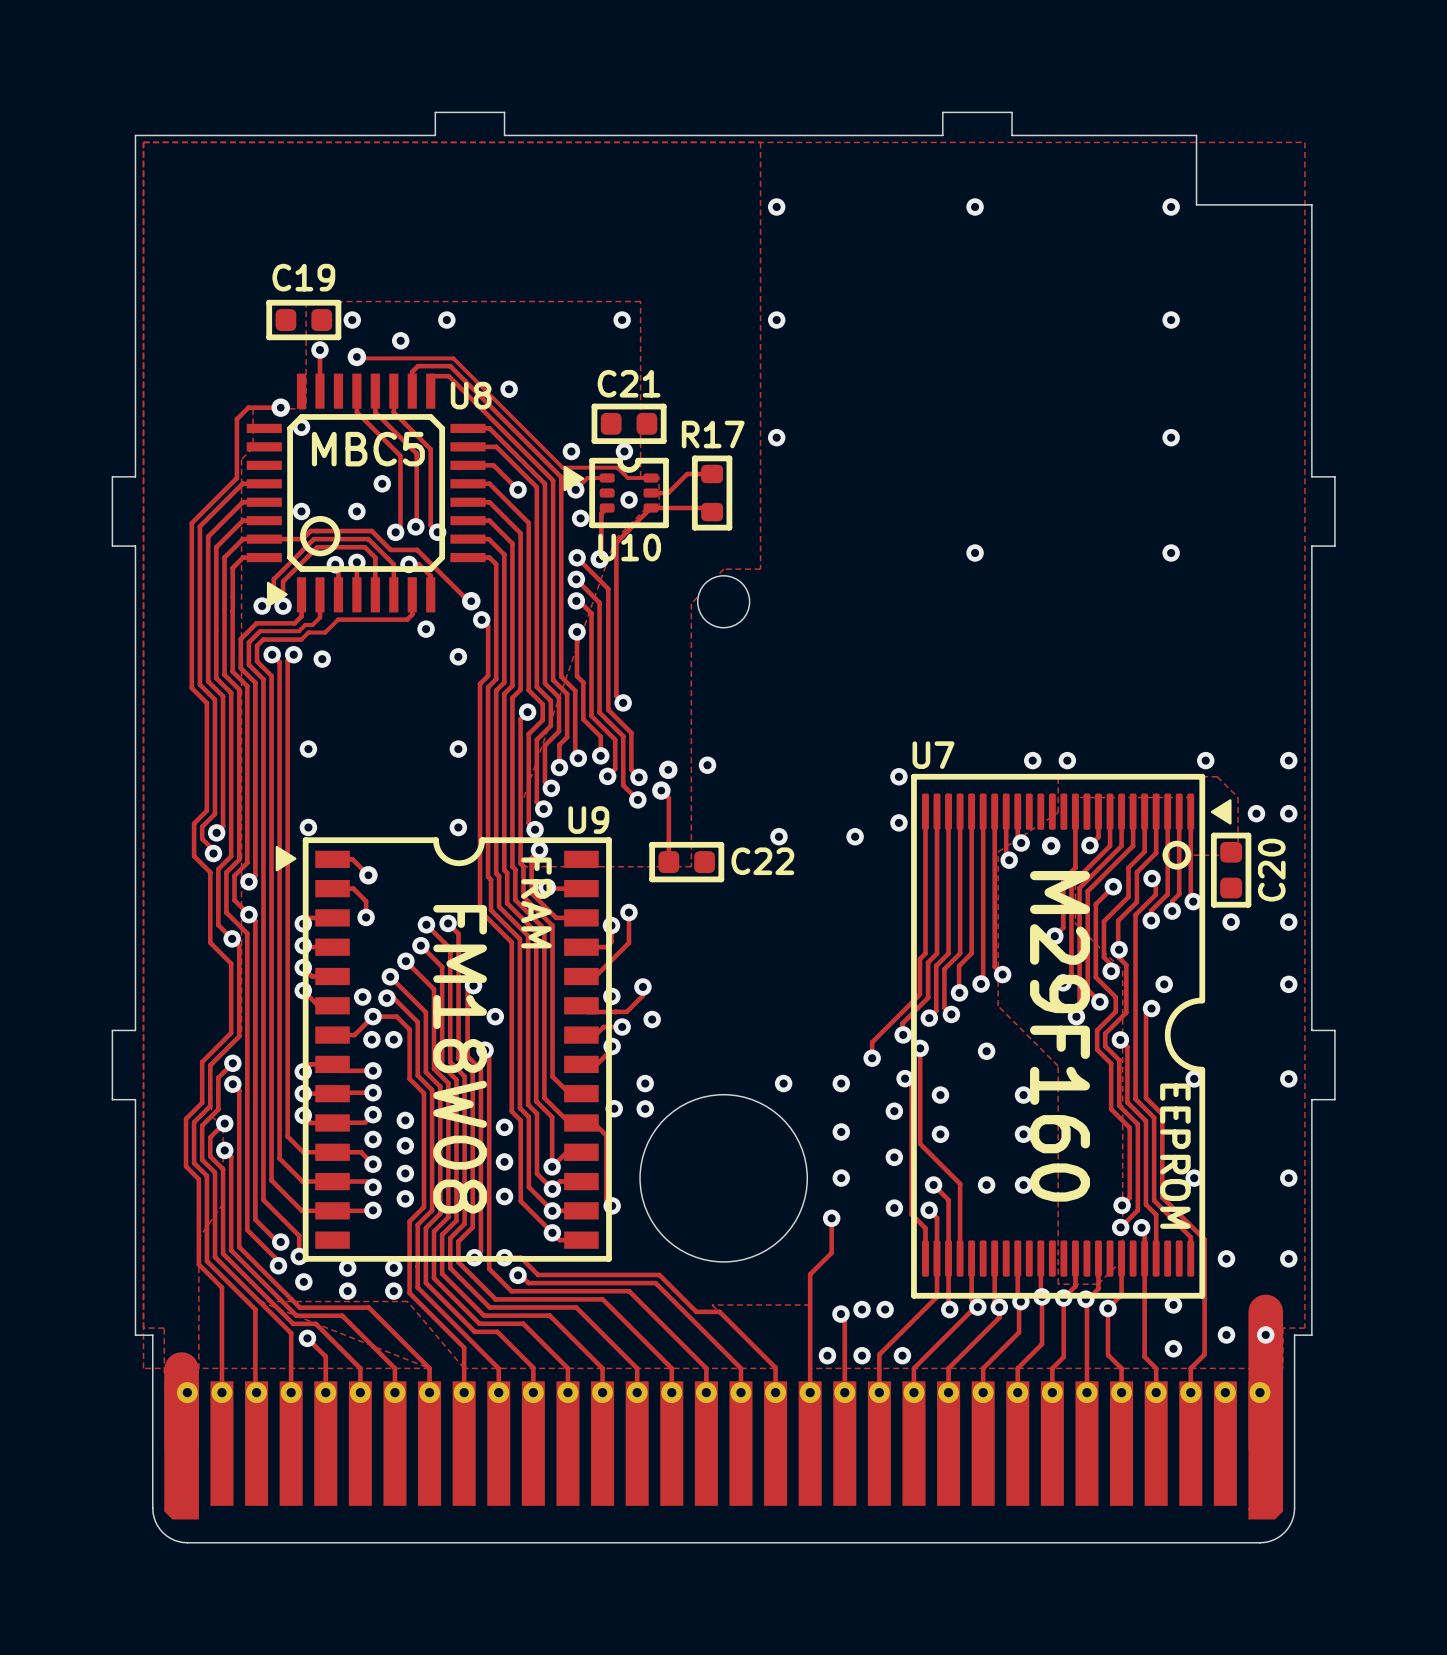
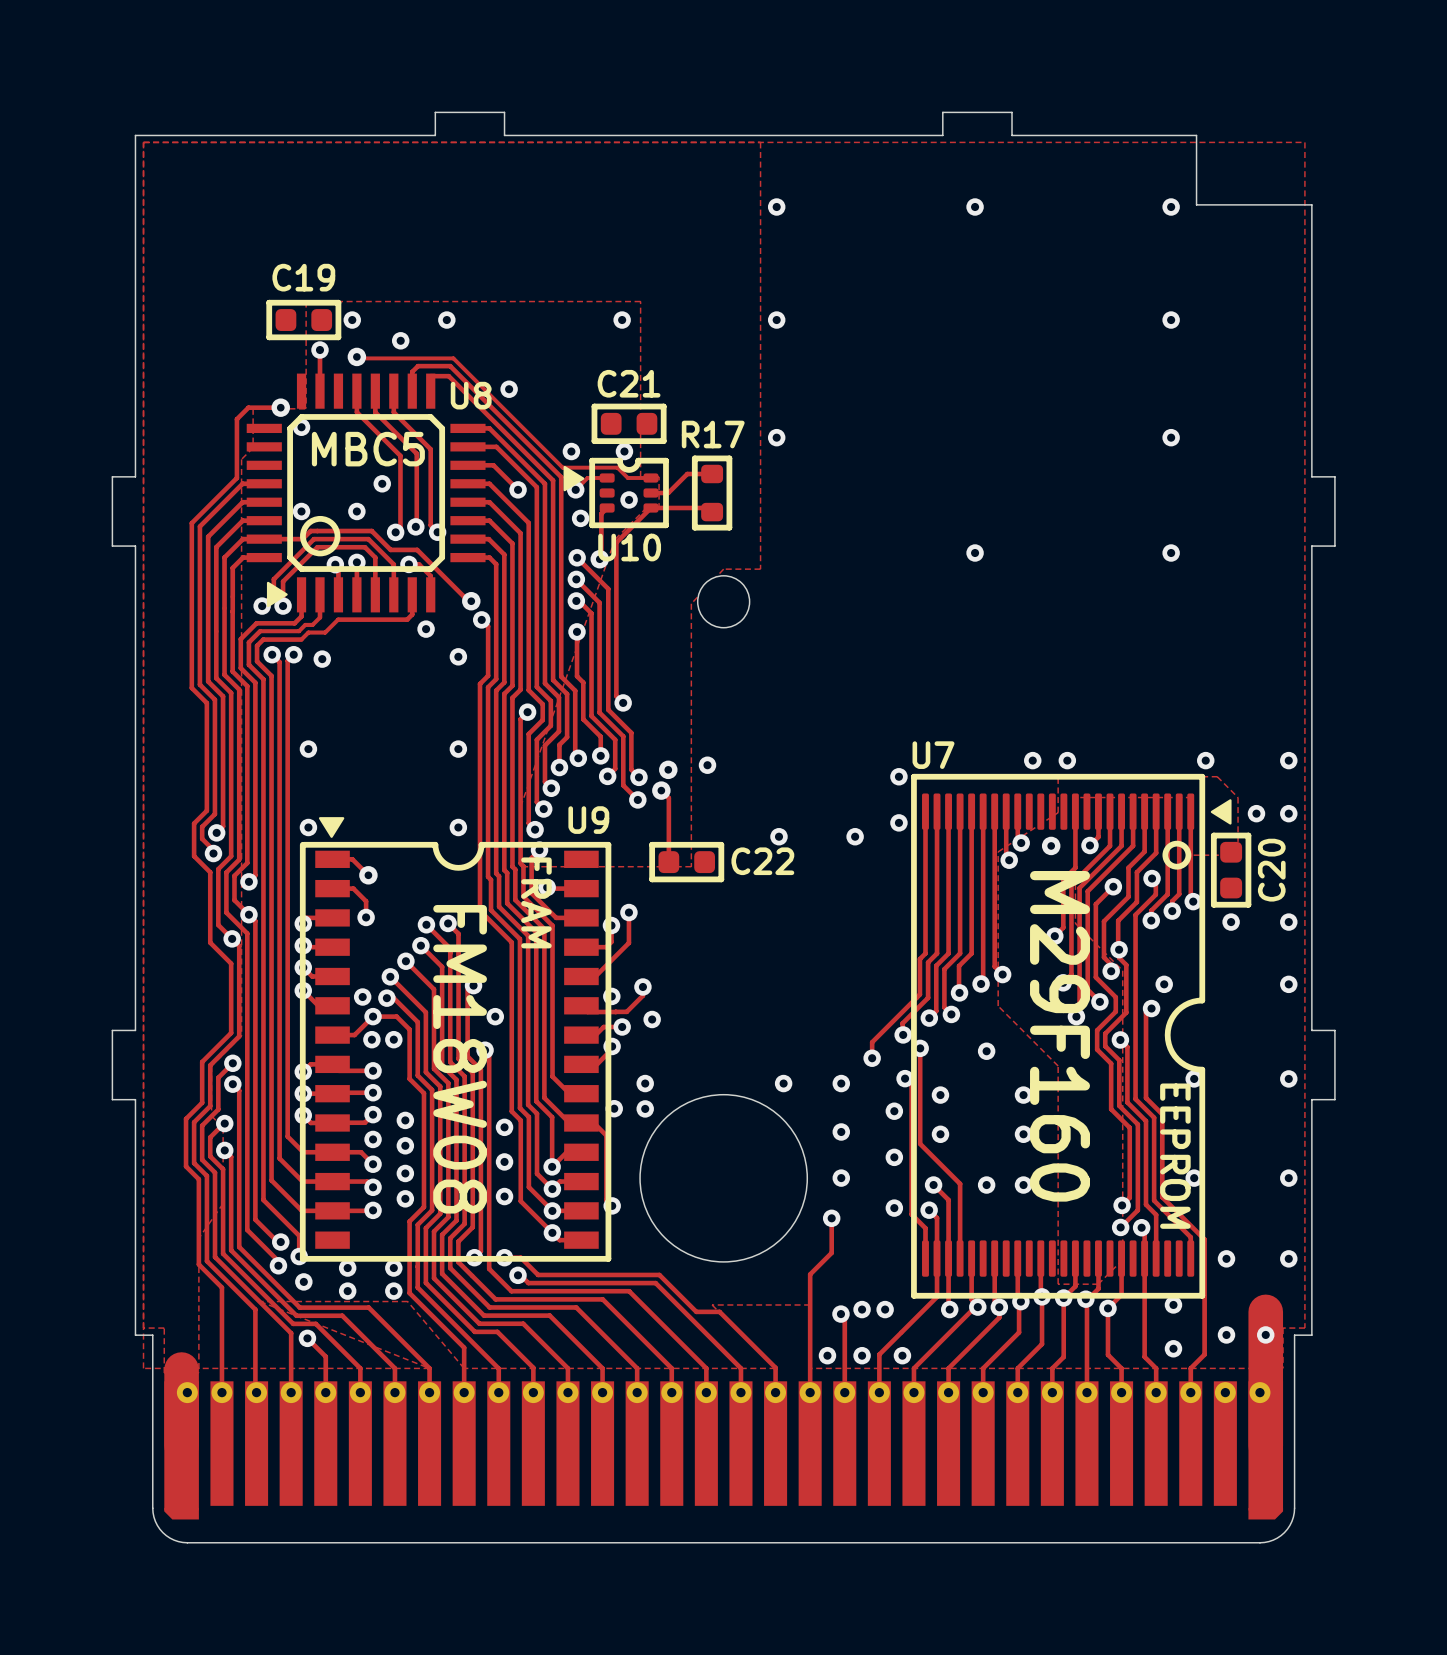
U9 footprint: [275, 837, 612, 1262] -> [299, 817, 612, 1262]

